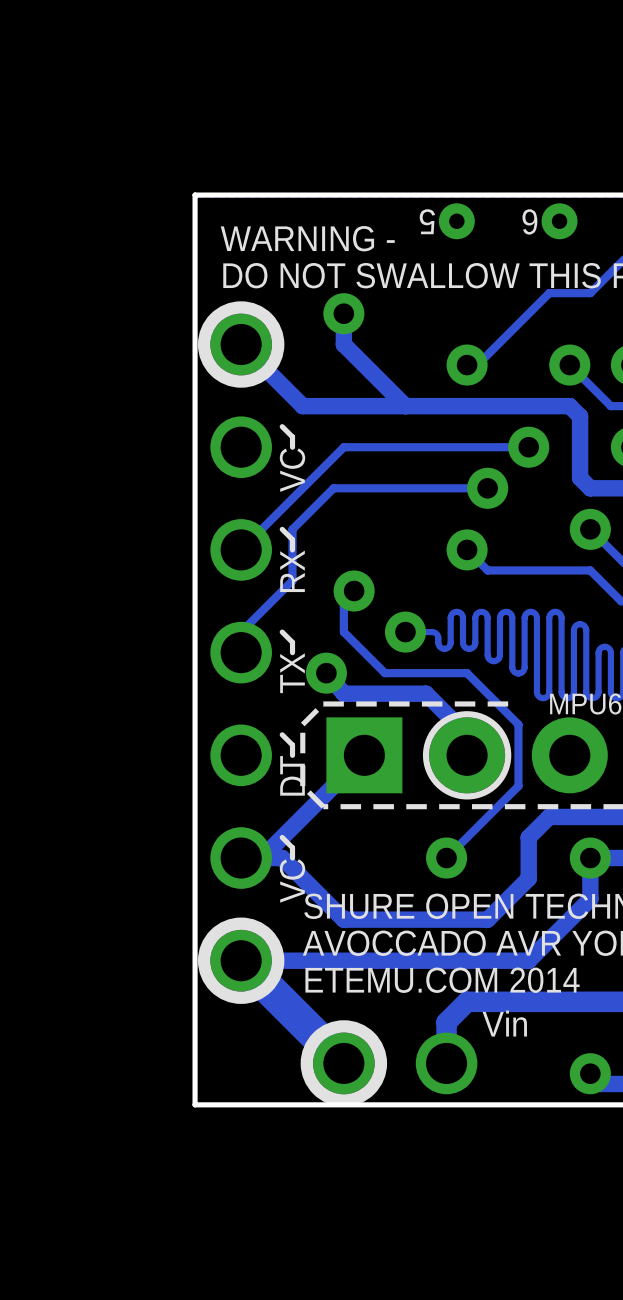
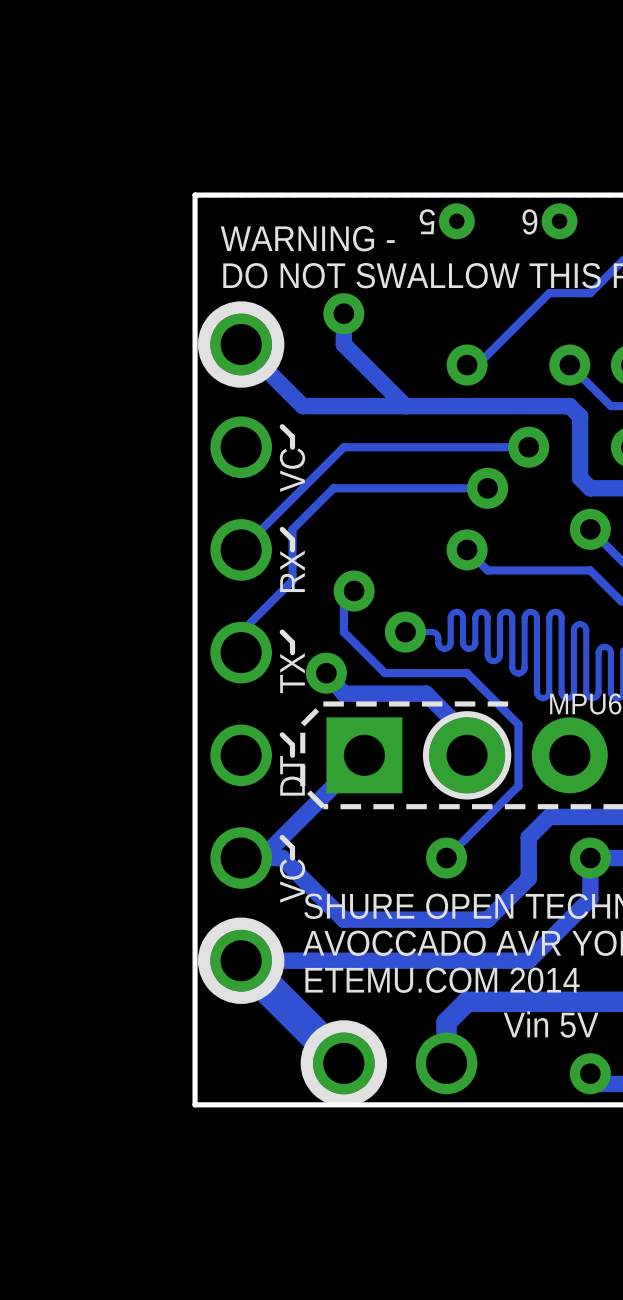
text: Vin (504, 1023) -> Vin 5V (551, 1024)

